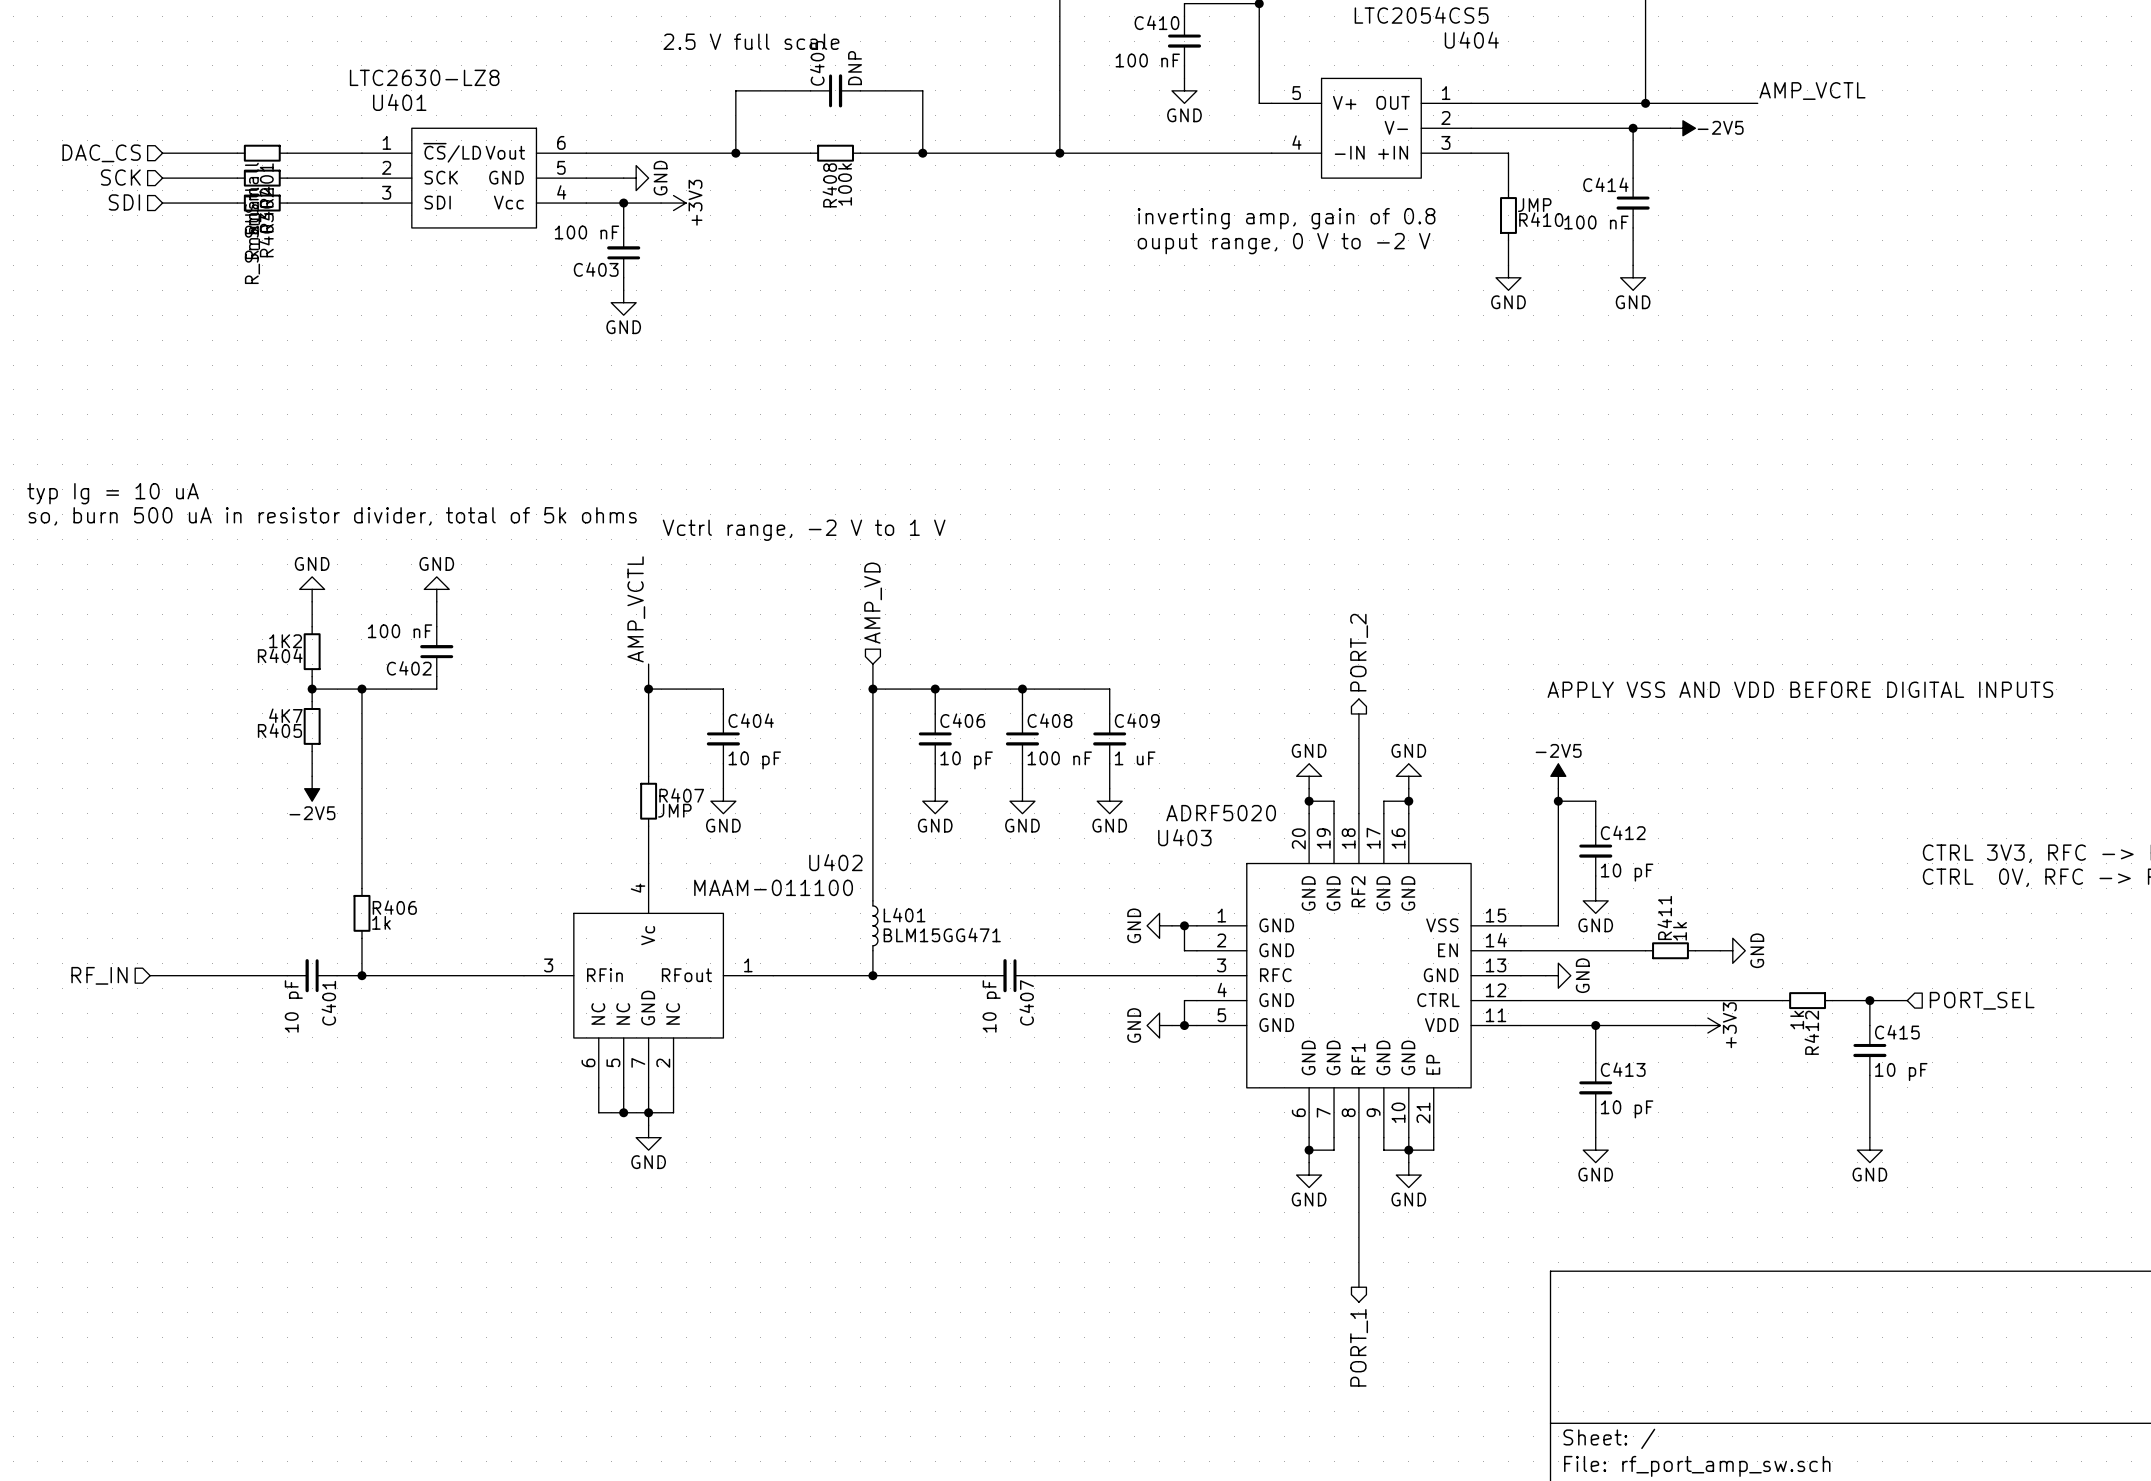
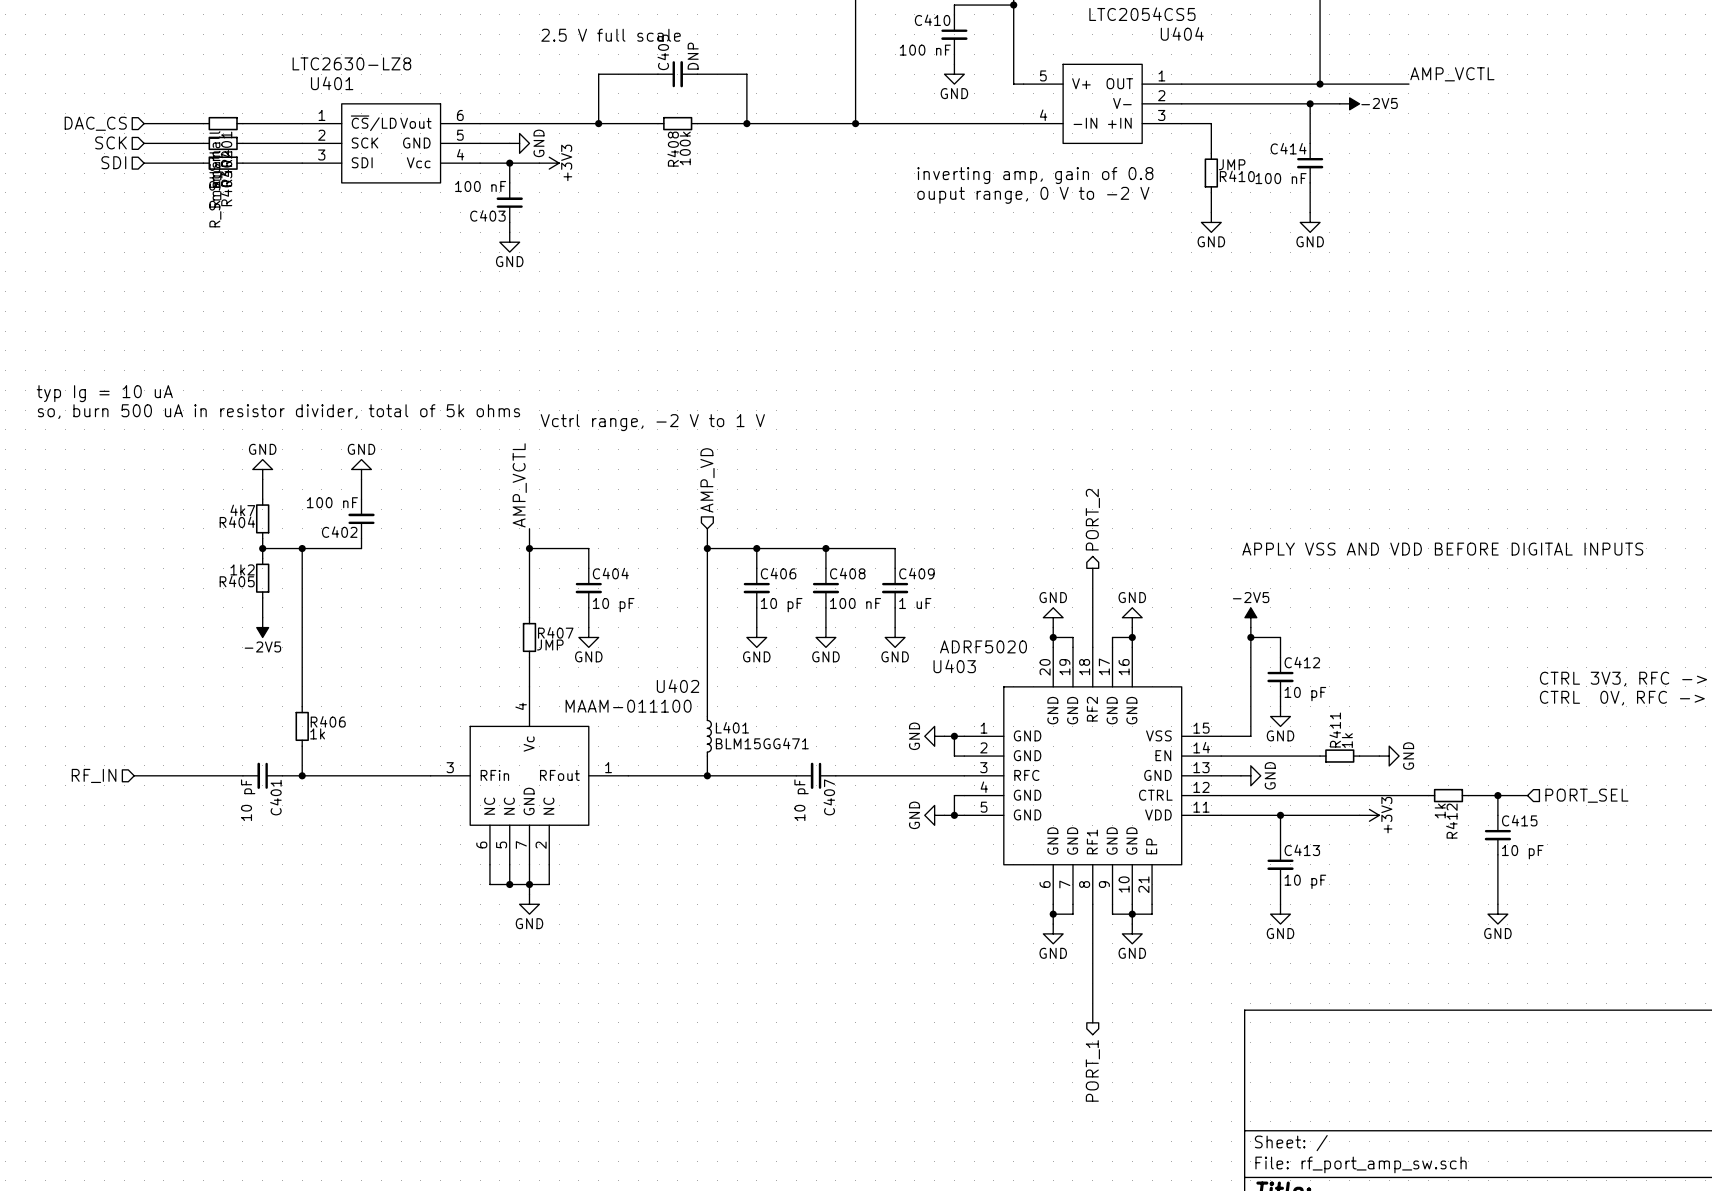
R404 value: 1K2 (285, 641) -> 4k7 (242, 510)
R405 value: 4K7 (285, 715) -> 1k2 (242, 569)

